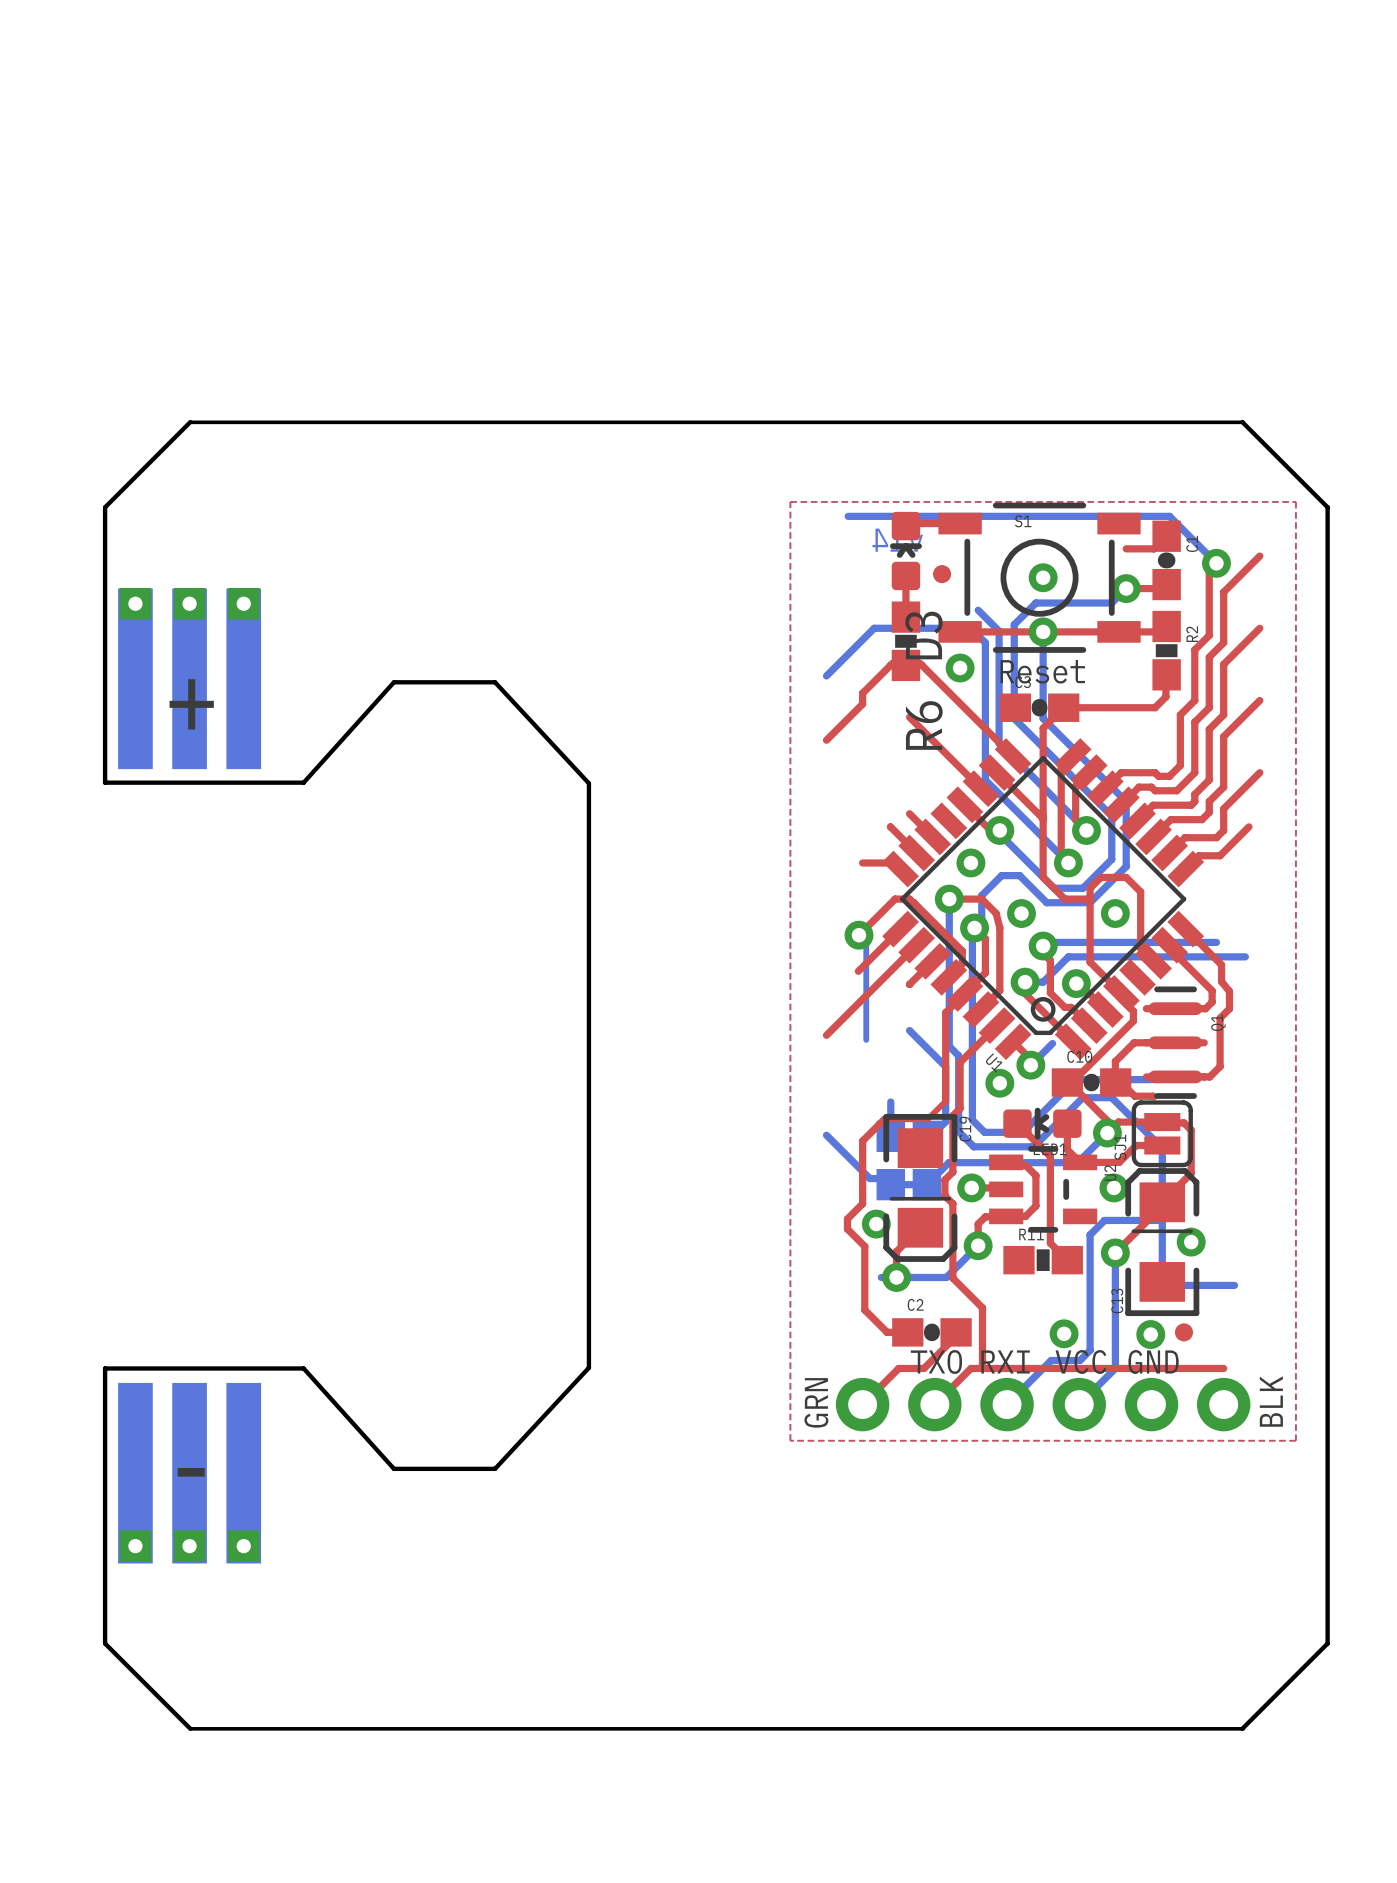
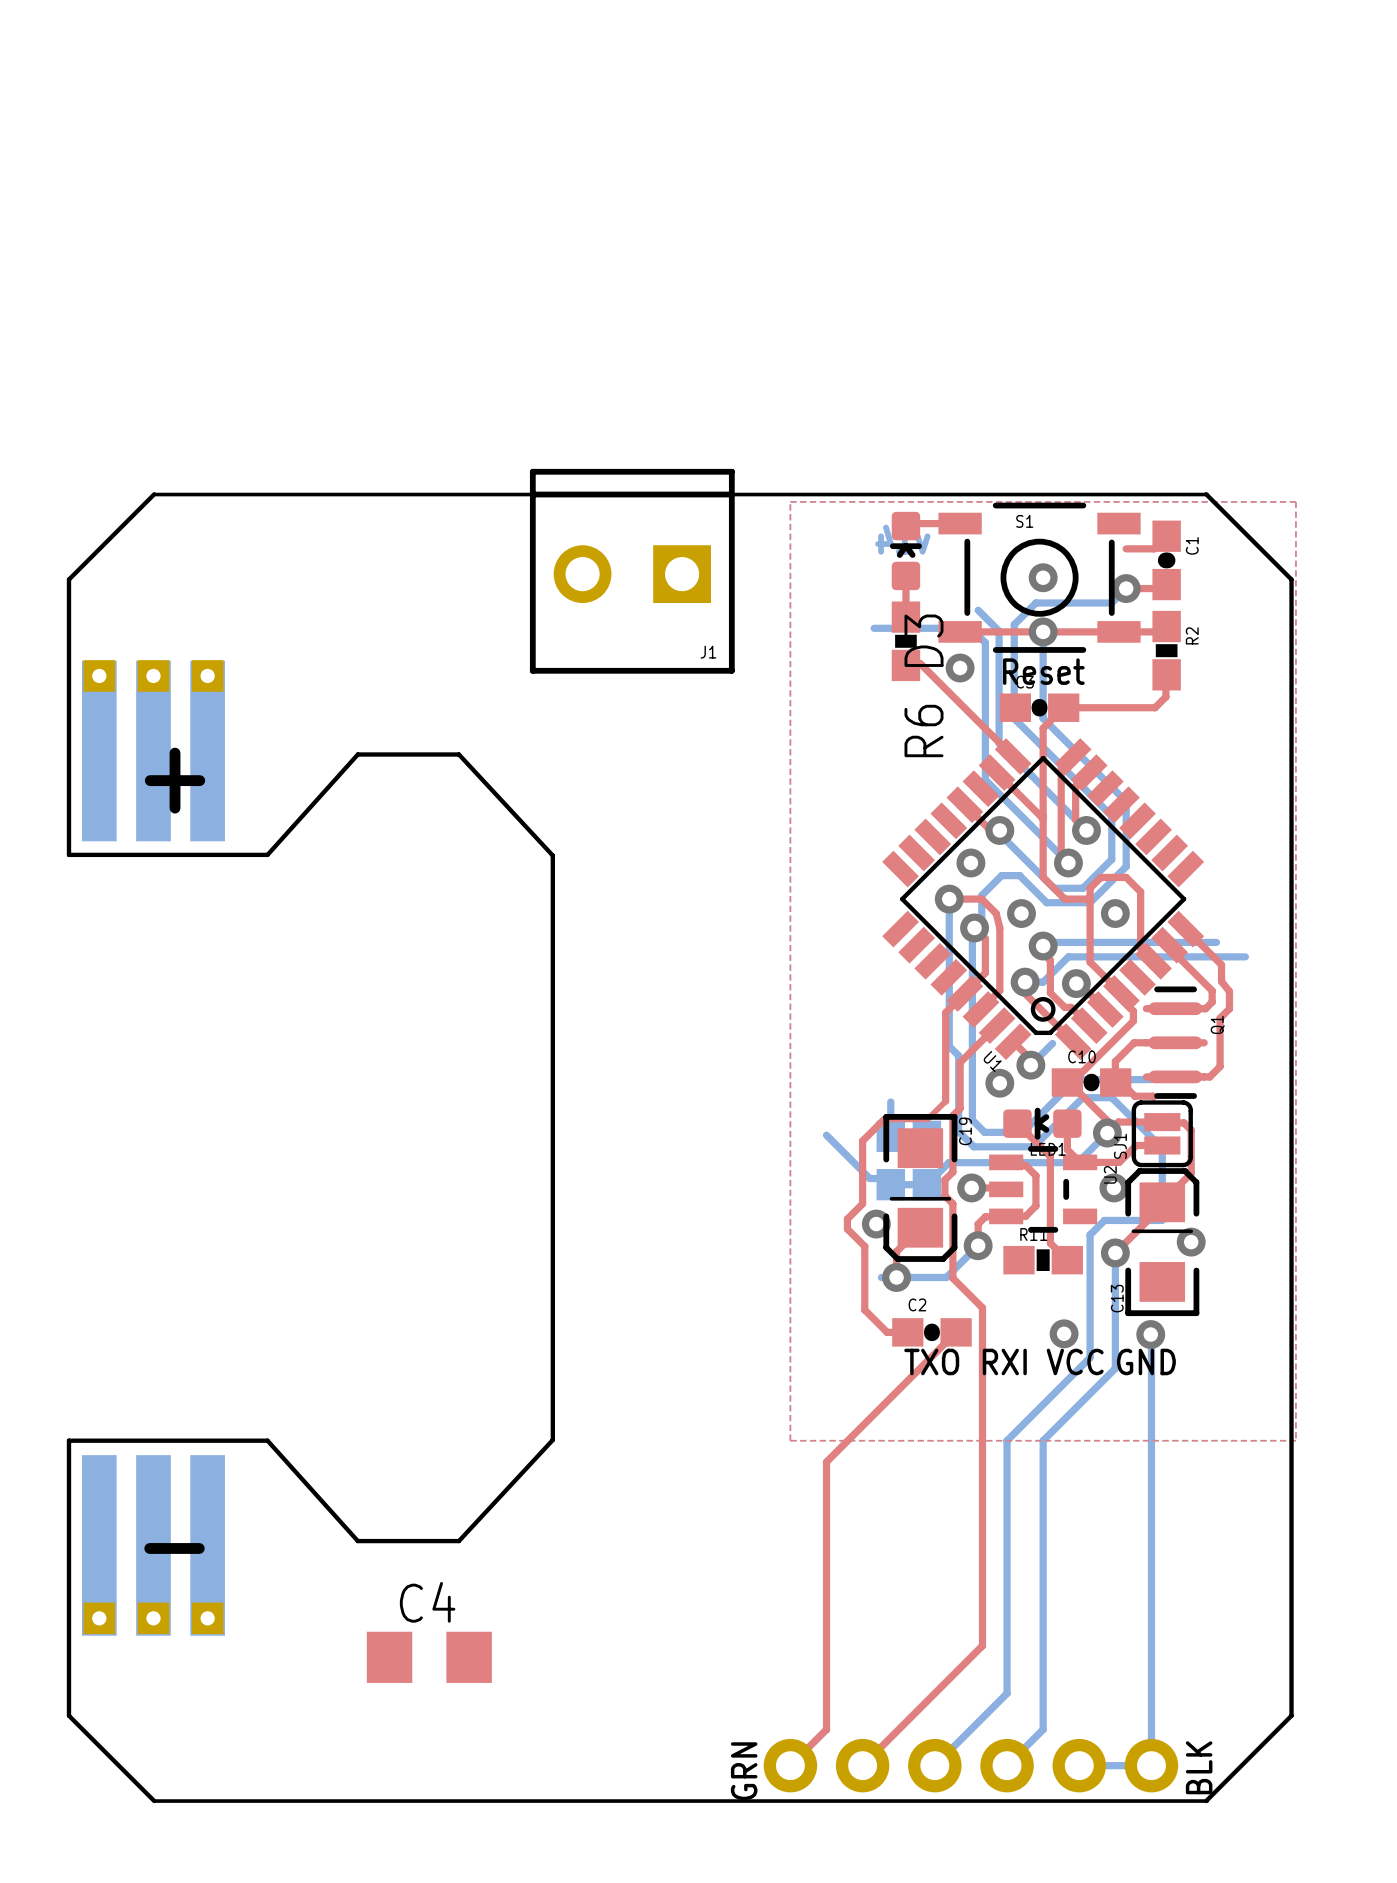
bottom track: (848, 516) (1169, 516) (1216, 563) -> none
top track: (1259, 556) (1223, 592) (1223, 642) (1209, 657) (1209, 707) (1194, 722) (1194, 772) (1176, 790) (1155, 790) (1151, 787) (1139, 787) (1121, 804) -> none
top track: (1216, 563) (1209, 570) (1209, 635) (1194, 649) (1194, 700) (1180, 714) (1180, 765) (1169, 776) (1158, 776) (1155, 772) (1121, 772) (1105, 788) -> none
via: (1216, 563) -> none
J1: none -> (632, 571)
part: (942, 574) -> none
bottom track: (874, 628) (826, 675) -> none
top track: (1259, 628) (1223, 664) (1223, 714) (1209, 729) (1209, 779) (1194, 794) (1194, 801) (1191, 805) (1153, 805) (1137, 820) -> none
top track: (892, 663) (862, 693) (862, 704) (826, 740) -> none
top track: (1259, 700) (1223, 736) (1223, 787) (1209, 801) (1209, 812) (1202, 819) (1170, 819) (1153, 836) -> none
top track: (909, 717) (980, 788) -> none
top track: (1259, 772) (1223, 808) (1223, 830) (1216, 837) (1184, 837) (1169, 853) -> none
top track: (909, 813) (932, 836) -> none
top track: (890, 826) (916, 853) -> none
top track: (1248, 826) (1220, 855) (1199, 855) (1185, 869) -> none
top track: (862, 862) (898, 862) -> none
top track: (900, 929) (858, 971) -> none
top track: (859, 935) (895, 899) (909, 899) (962, 951) (962, 963) (948, 977) -> none
bottom track: (859, 935) (866, 942) (866, 1039) -> none
via: (859, 935) -> none
top track: (916, 945) (826, 1035) -> none
top track: (932, 961) (909, 984) -> none
bottom track: (909, 1030) (945, 1066) (945, 1121) (925, 1142) -> none
part position: (716, 1075) -> (680, 1147)
bottom track: (1162, 1191) (1162, 1267) (1180, 1285) (1234, 1285) -> none
top track: none -> (956, 1332) (826, 1461) (826, 1729) (790, 1765)
part: (1183, 1332) -> none
bottom track: none -> (1150, 1334) (1151, 1765) (1079, 1765)
top track: (956, 1336) (924, 1368) (898, 1368) (862, 1404) -> none
bottom track: (1090, 1350) (1079, 1360) (1051, 1360) (1007, 1404) -> (1090, 1350) (1090, 1357) (1007, 1440) (1007, 1693) (934, 1765)
top track: none -> (982, 1368) (982, 1645) (862, 1765)
top track: (1223, 1368) (970, 1368) (934, 1404) -> none
text position: BLK (1271, 1401) -> BLK (1199, 1767)
text position: GRN (816, 1402) -> GRN (744, 1771)
part position: (1043, 1404) -> (970, 1765)
bottom track: none -> (1079, 1404) (1043, 1440) (1043, 1729) (1007, 1765)
C4: none -> (429, 1657)

